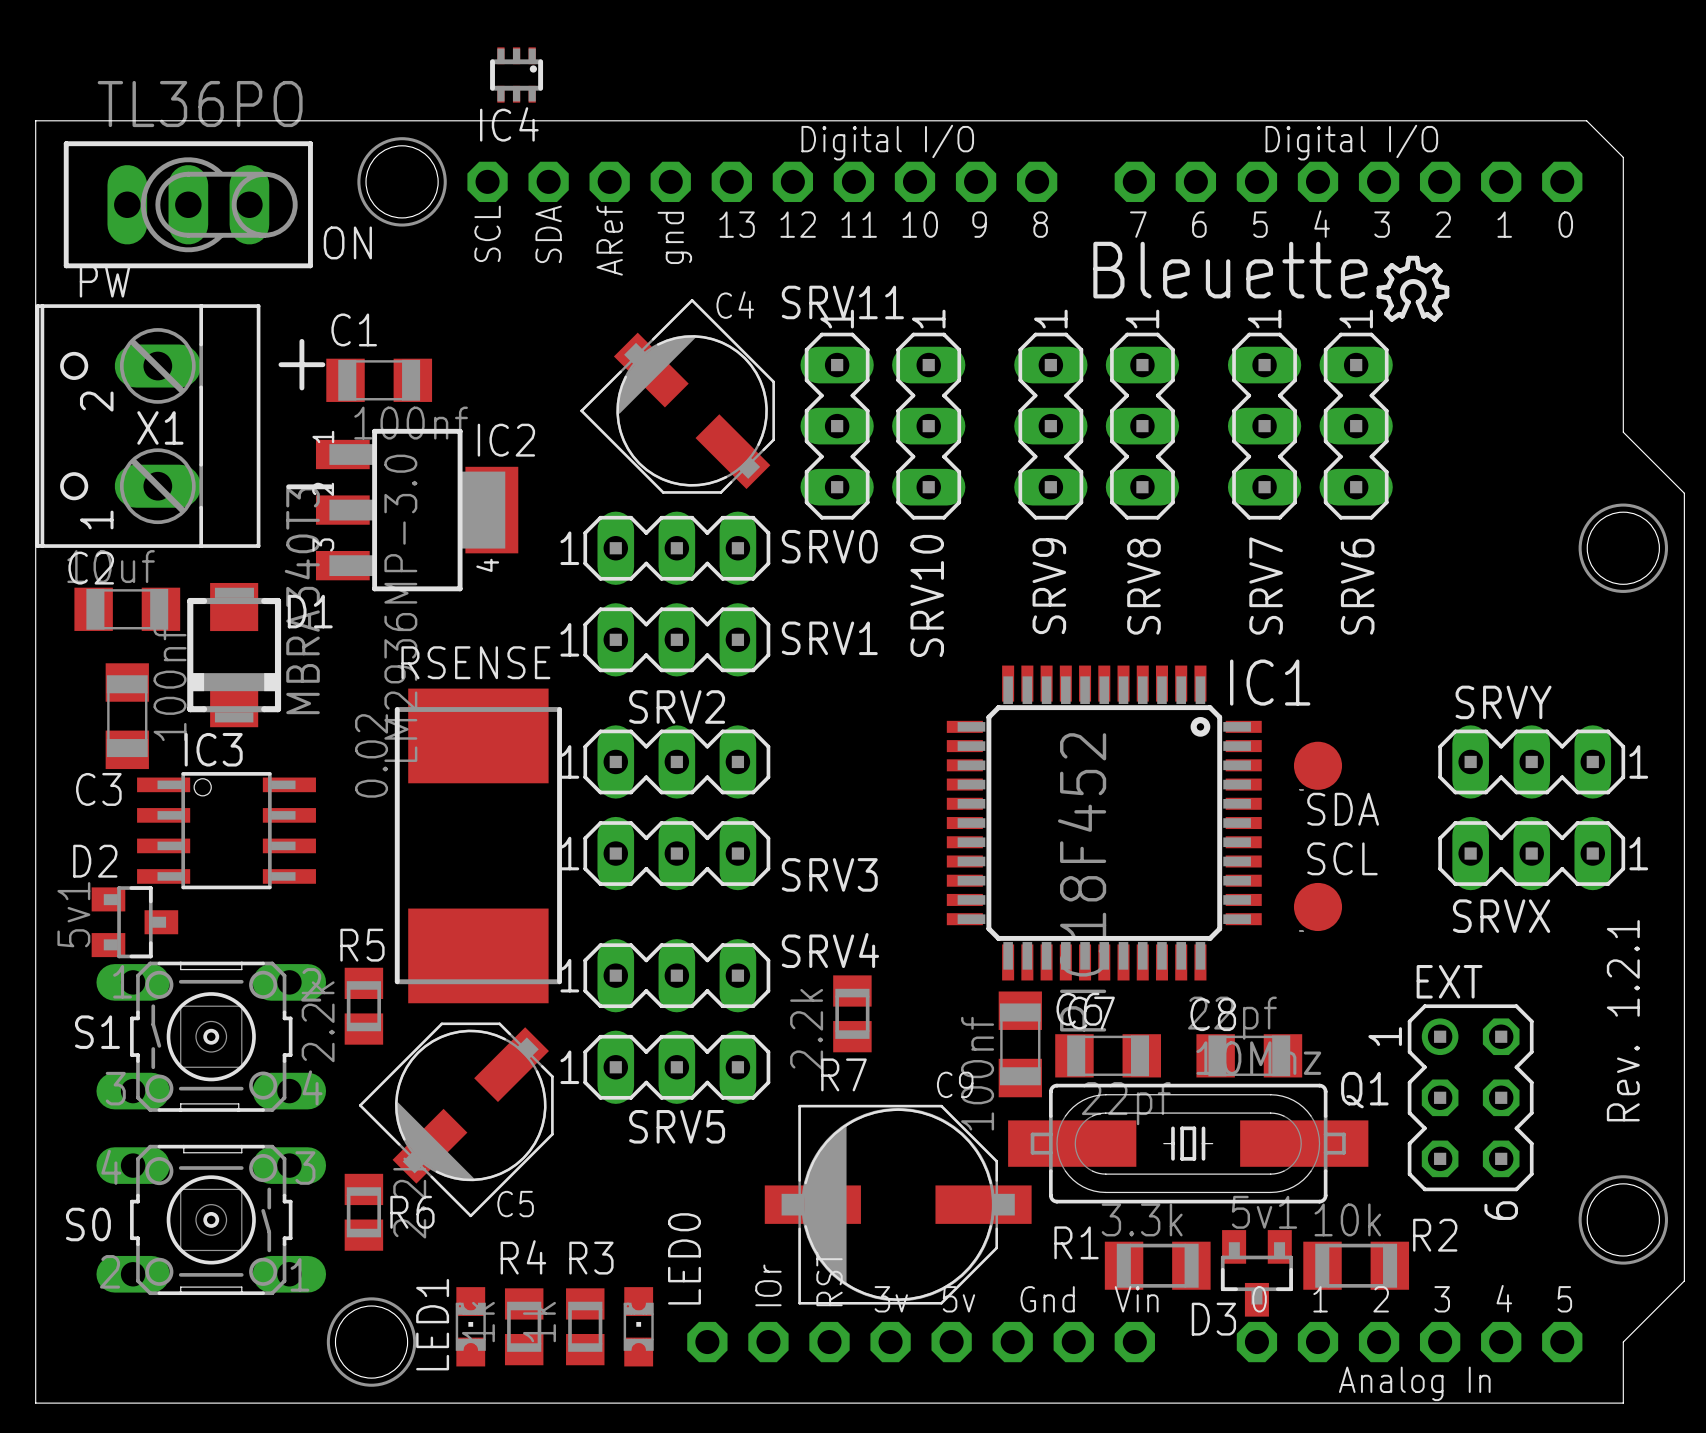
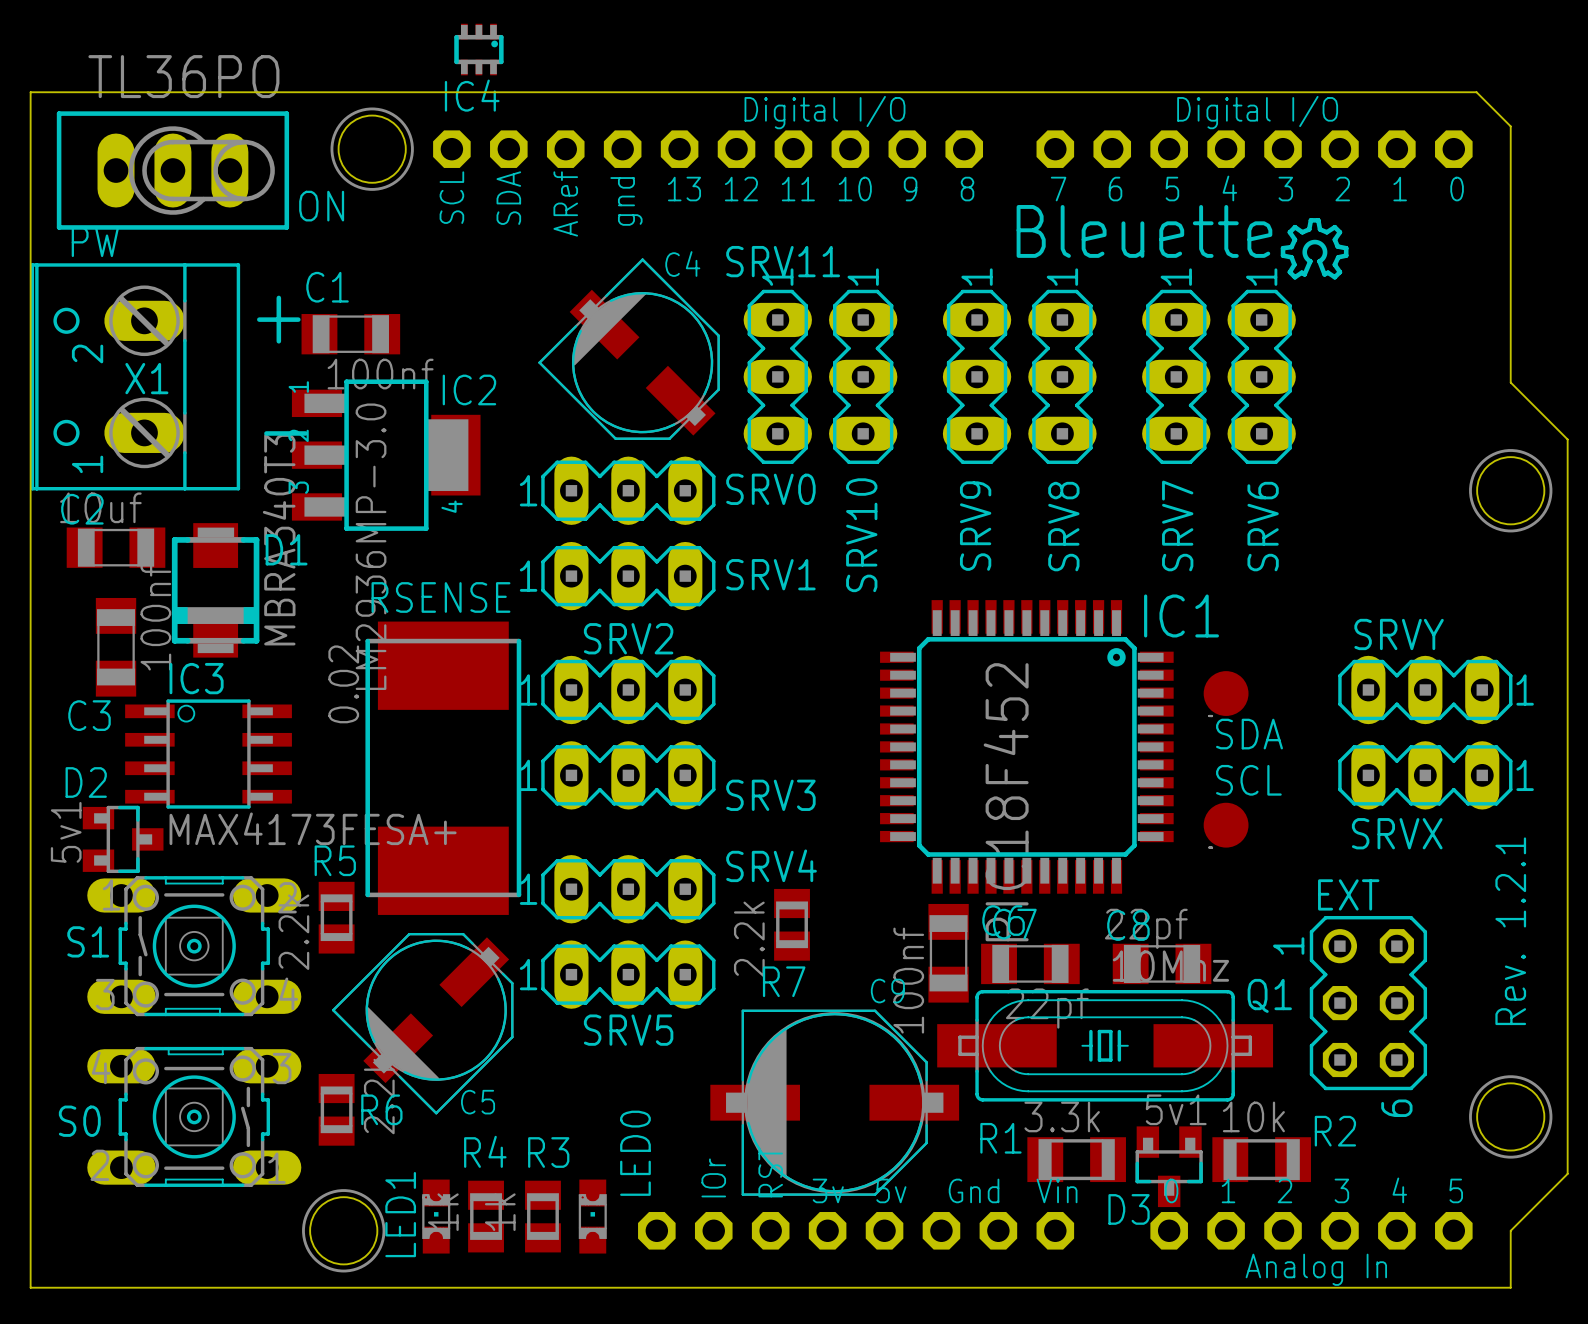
IC3 value: none -> MAX4173FESA+ (313, 828)

